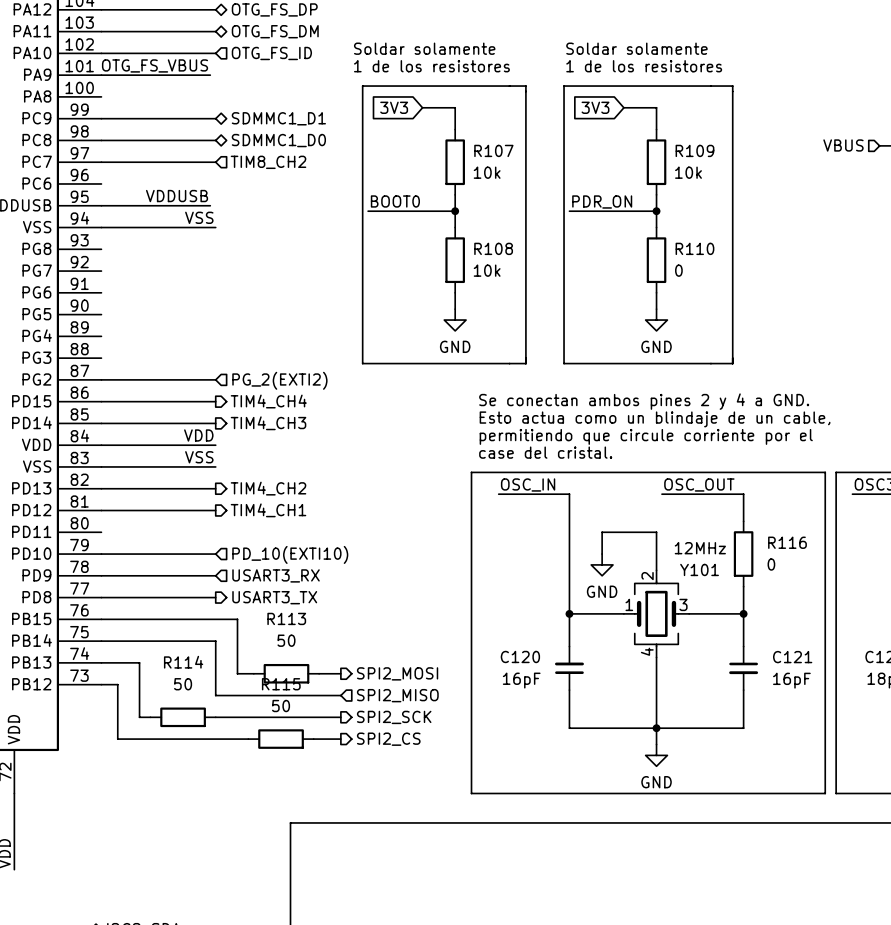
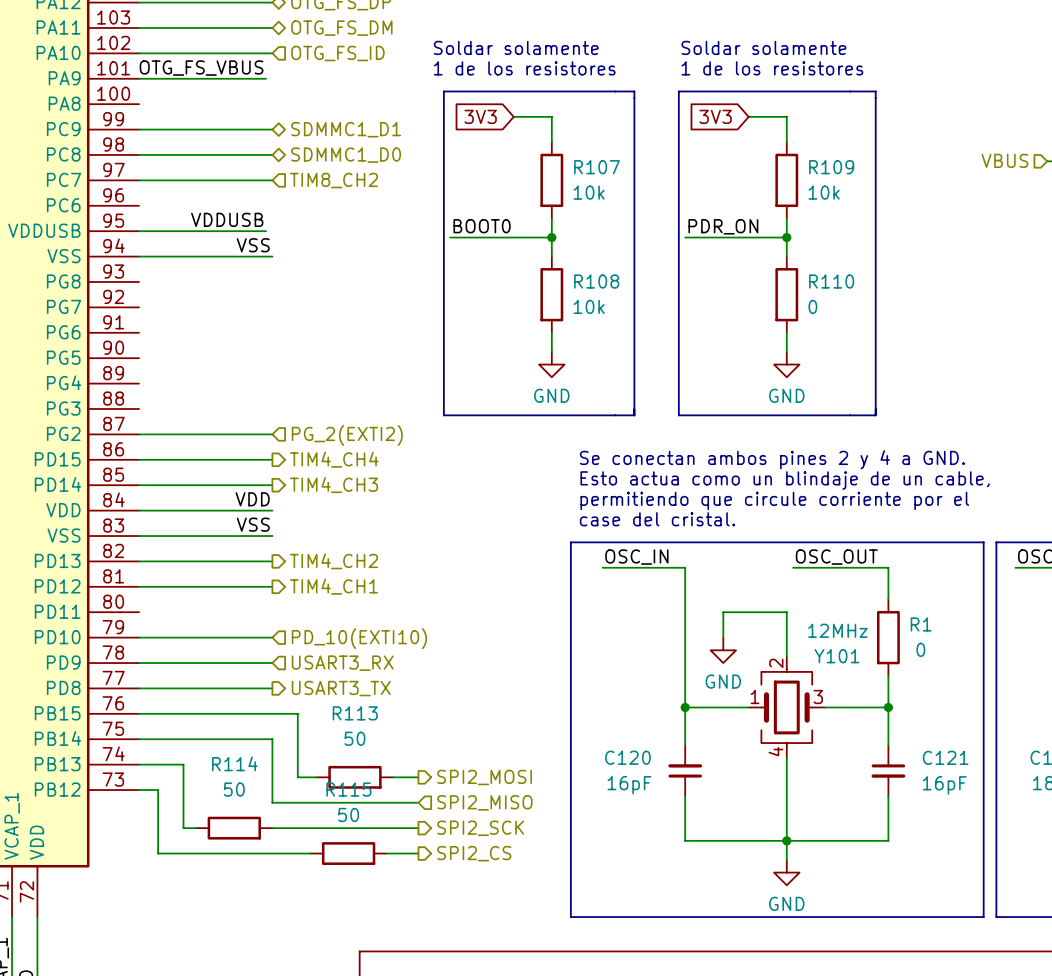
R116 name: R116 (787, 542) -> R1 (921, 624)

